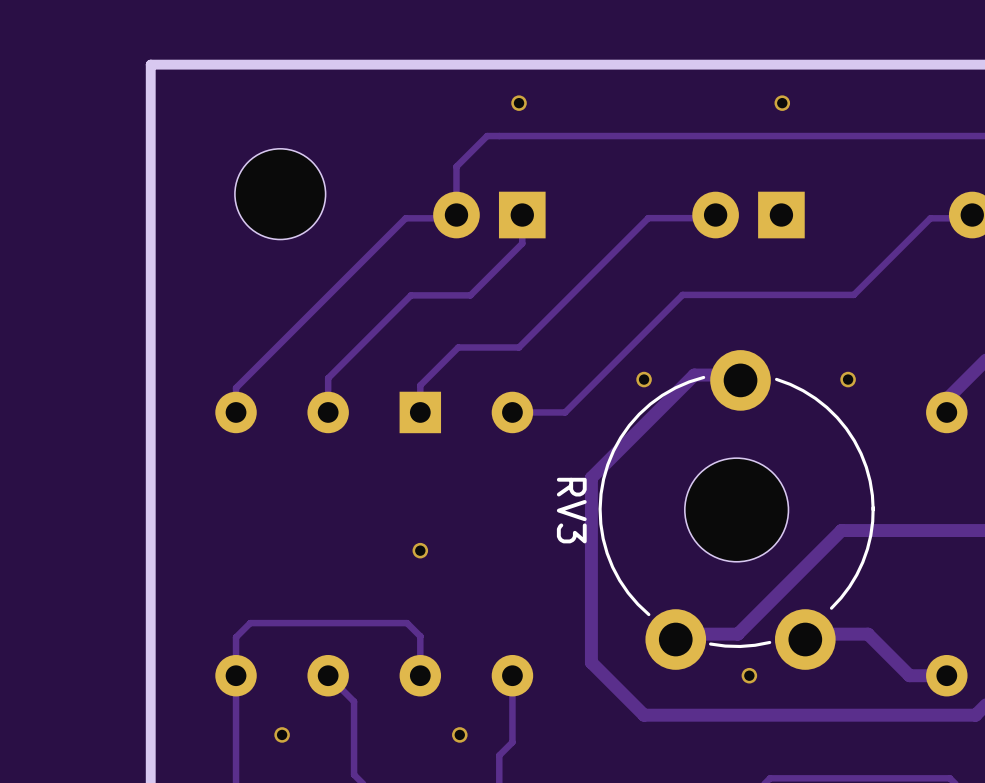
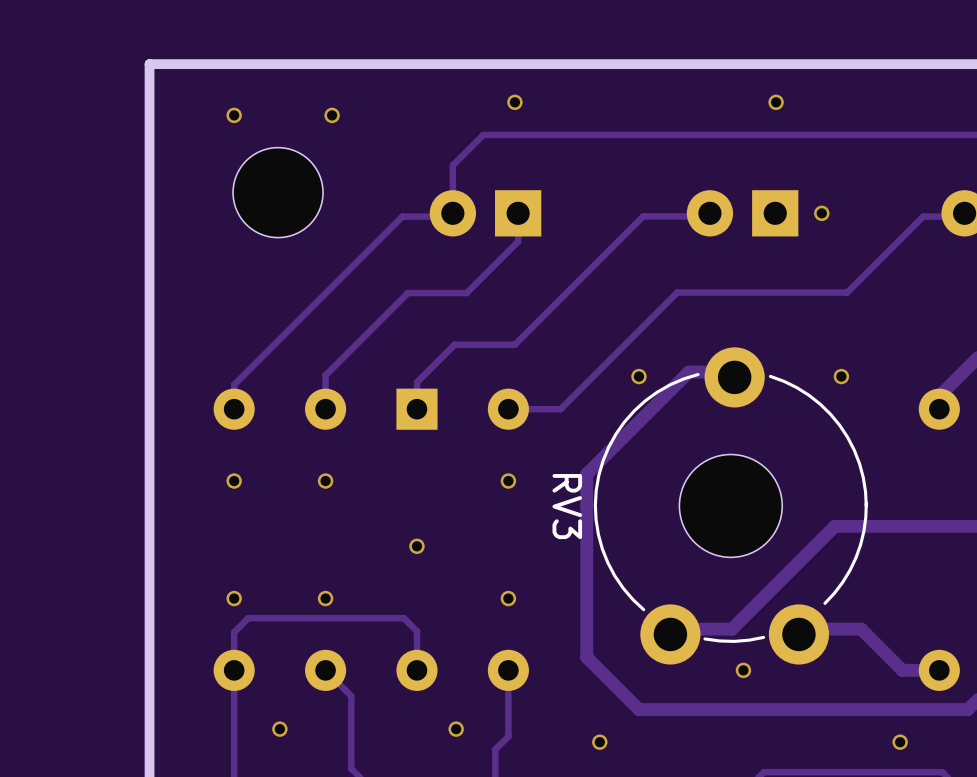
via: none -> (234, 115)
via: none -> (332, 115)
via: none -> (821, 213)
via: none -> (234, 481)
via: none -> (325, 481)
via: none -> (508, 481)
via: none -> (234, 598)
via: none -> (325, 598)
via: none -> (508, 598)
via: none -> (599, 742)
via: none -> (900, 742)

